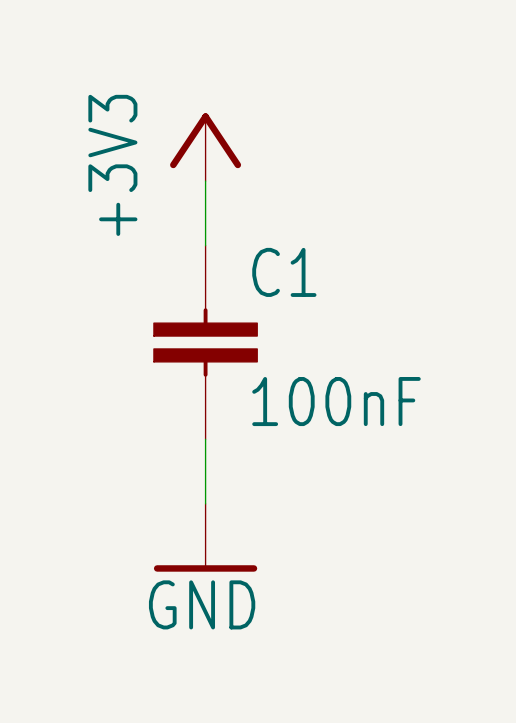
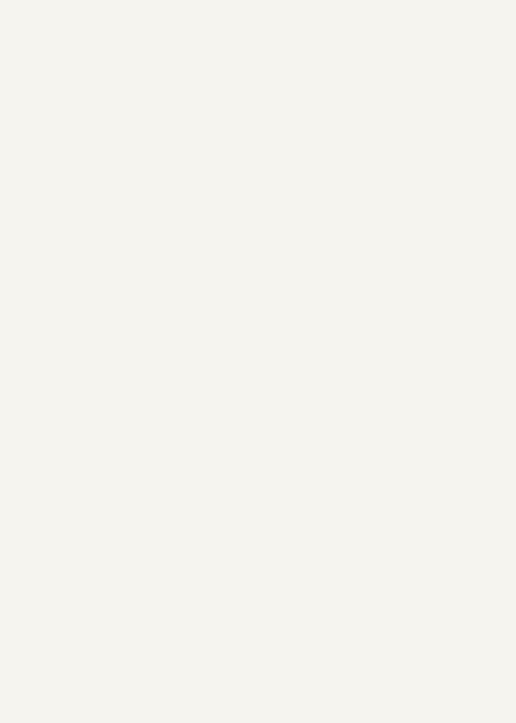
power symbol: +3V3 (205, 147) -> none
wire: (205, 181) (205, 245) -> none
C1: 100nF (205, 342) -> none
wire: (205, 439) (205, 503) -> none
power symbol: GND (205, 537) -> none

